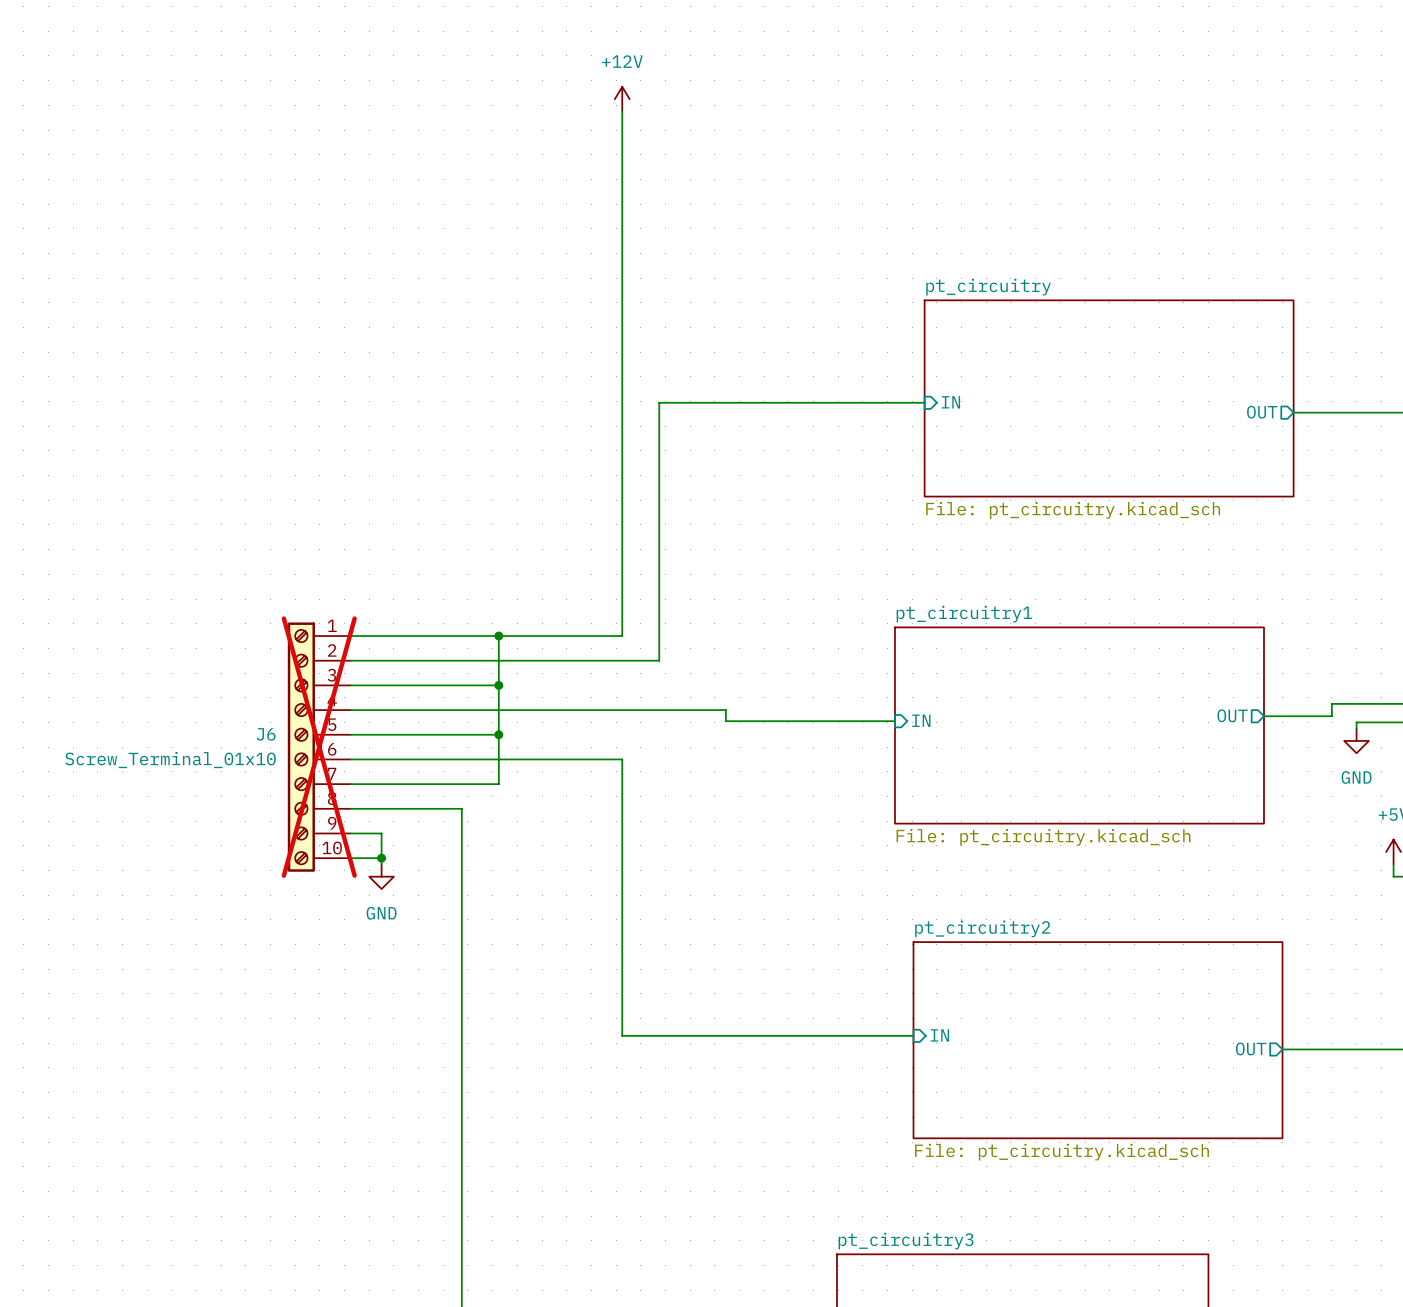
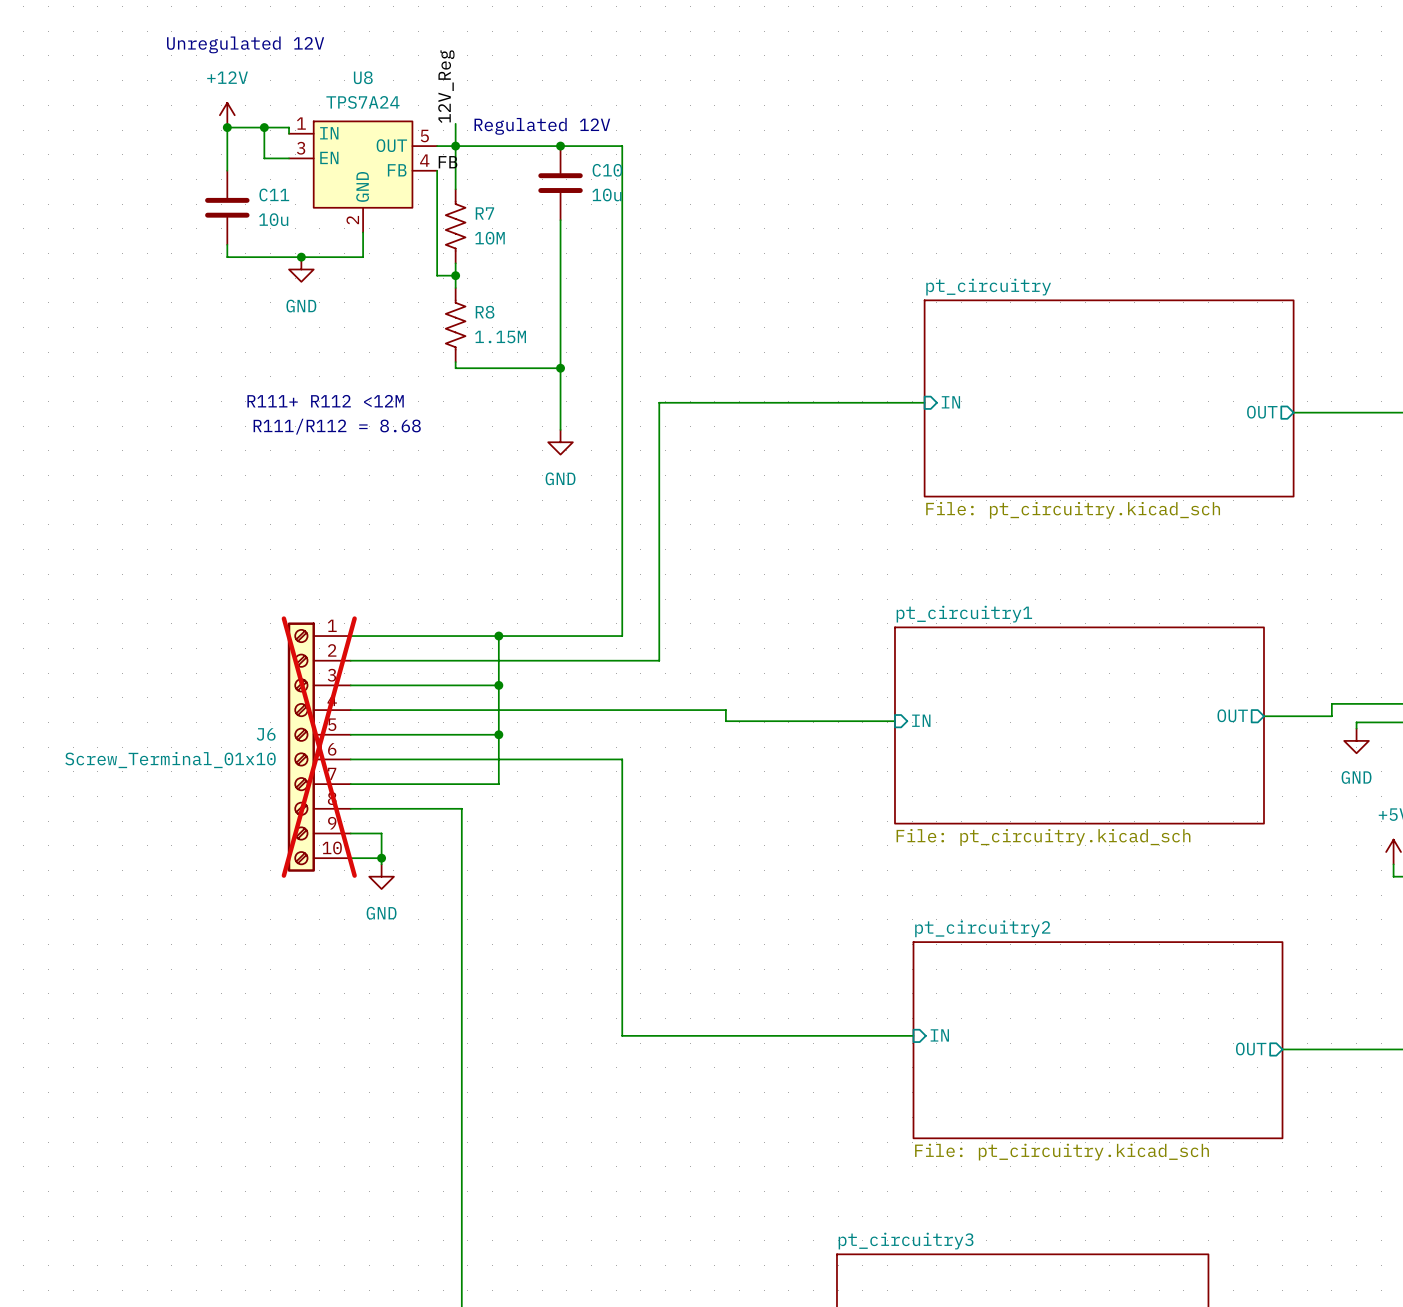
text: none -> Unregulated 12V (245, 44)
label: none -> 12V_Reg (446, 86)
power symbol: +12V (622, 99) -> none
wire: (622, 111) (622, 146) -> (437, 146) (622, 146)
power symbol: none -> +12V (227, 115)
wire: none -> (455, 123) (455, 189)
text: none -> Regulated 12V (542, 126)
junction: none -> (227, 127)
wire: none -> (264, 127) (264, 158) (289, 158)
junction: none -> (264, 127)
wire: none -> (289, 133) (289, 127) (227, 127) (227, 170)
junction: none -> (455, 146)
junction: none -> (560, 146)
label: none -> FB (448, 162)
wire: none -> (437, 170) (437, 275) (455, 275)
U8: none -> TPS7A24 (363, 176)
C10: none -> 10u (560, 183)
C11: none -> 10u (227, 207)
wire: none -> (560, 220) (560, 429)
R7: none -> 10M (455, 226)
wire: none -> (363, 232) (363, 257) (227, 257) (227, 244)
junction: none -> (301, 257)
wire: none -> (455, 263) (455, 288)
power symbol: none -> GND (301, 269)
junction: none -> (455, 275)
R8: none -> 1.15M (455, 325)
wire: none -> (455, 362) (455, 368) (560, 368)
junction: none -> (560, 368)
text: none -> R111+ R112 <12M (325, 401)
text: none -> R111/R112 = 8.68 (337, 426)
power symbol: none -> GND (560, 442)

